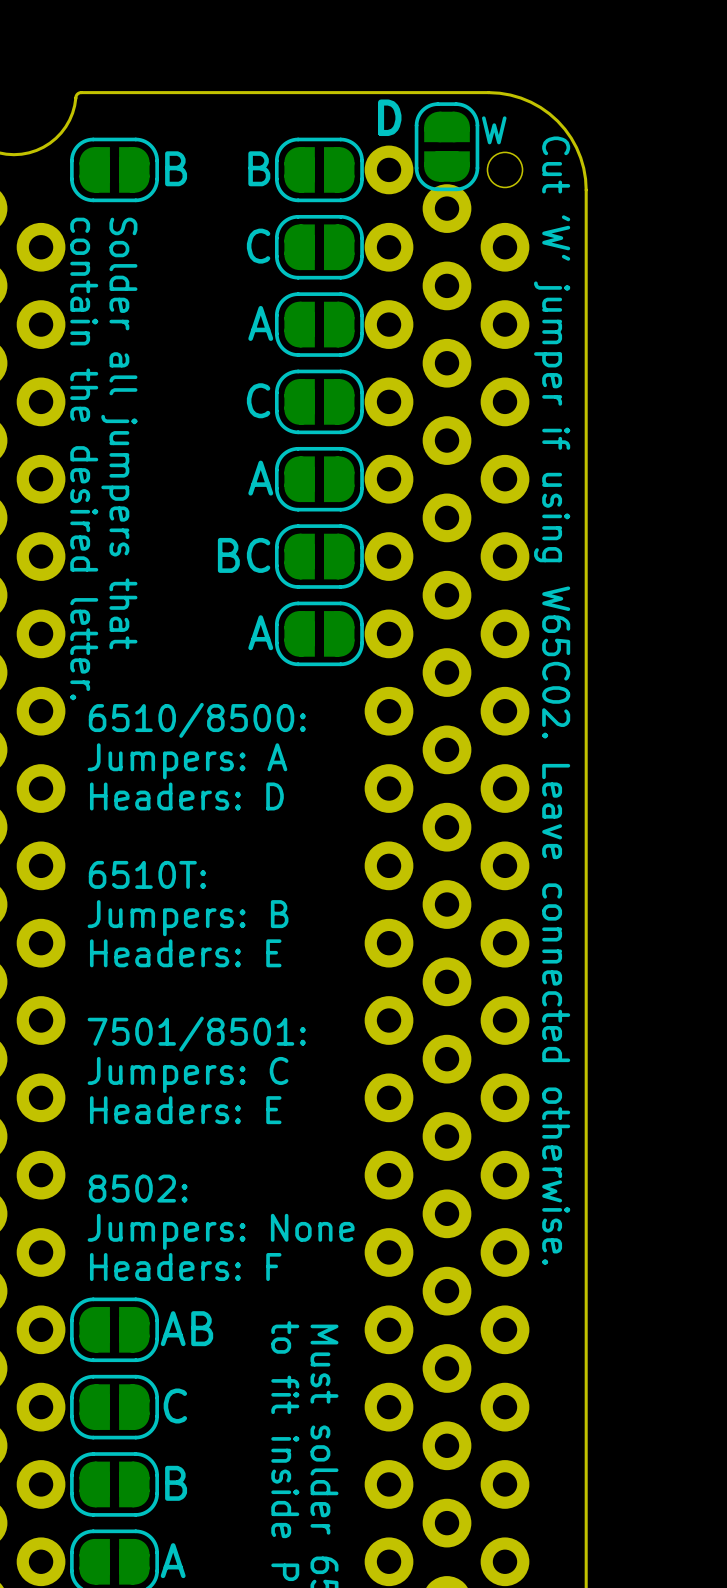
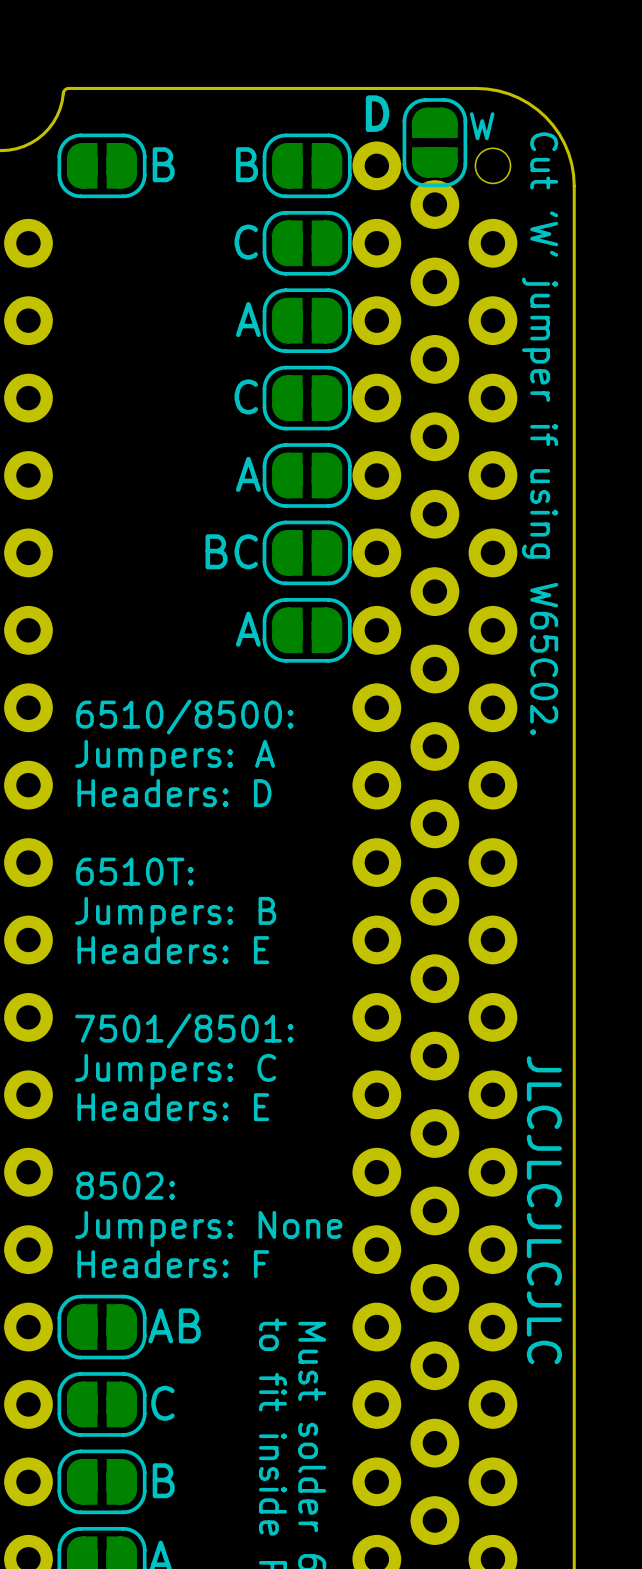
text: Solder all jumpers that (119, 433) -> none
text: contain the desired letter. (84, 458) -> none
text: Cut 'W' jumper if using W65C02. Leave connected otherwise. (552, 700) -> Cut 'W' jumper if using W65C02. (540, 433)
text: none -> JLCJLCJLCJLC (544, 1210)

